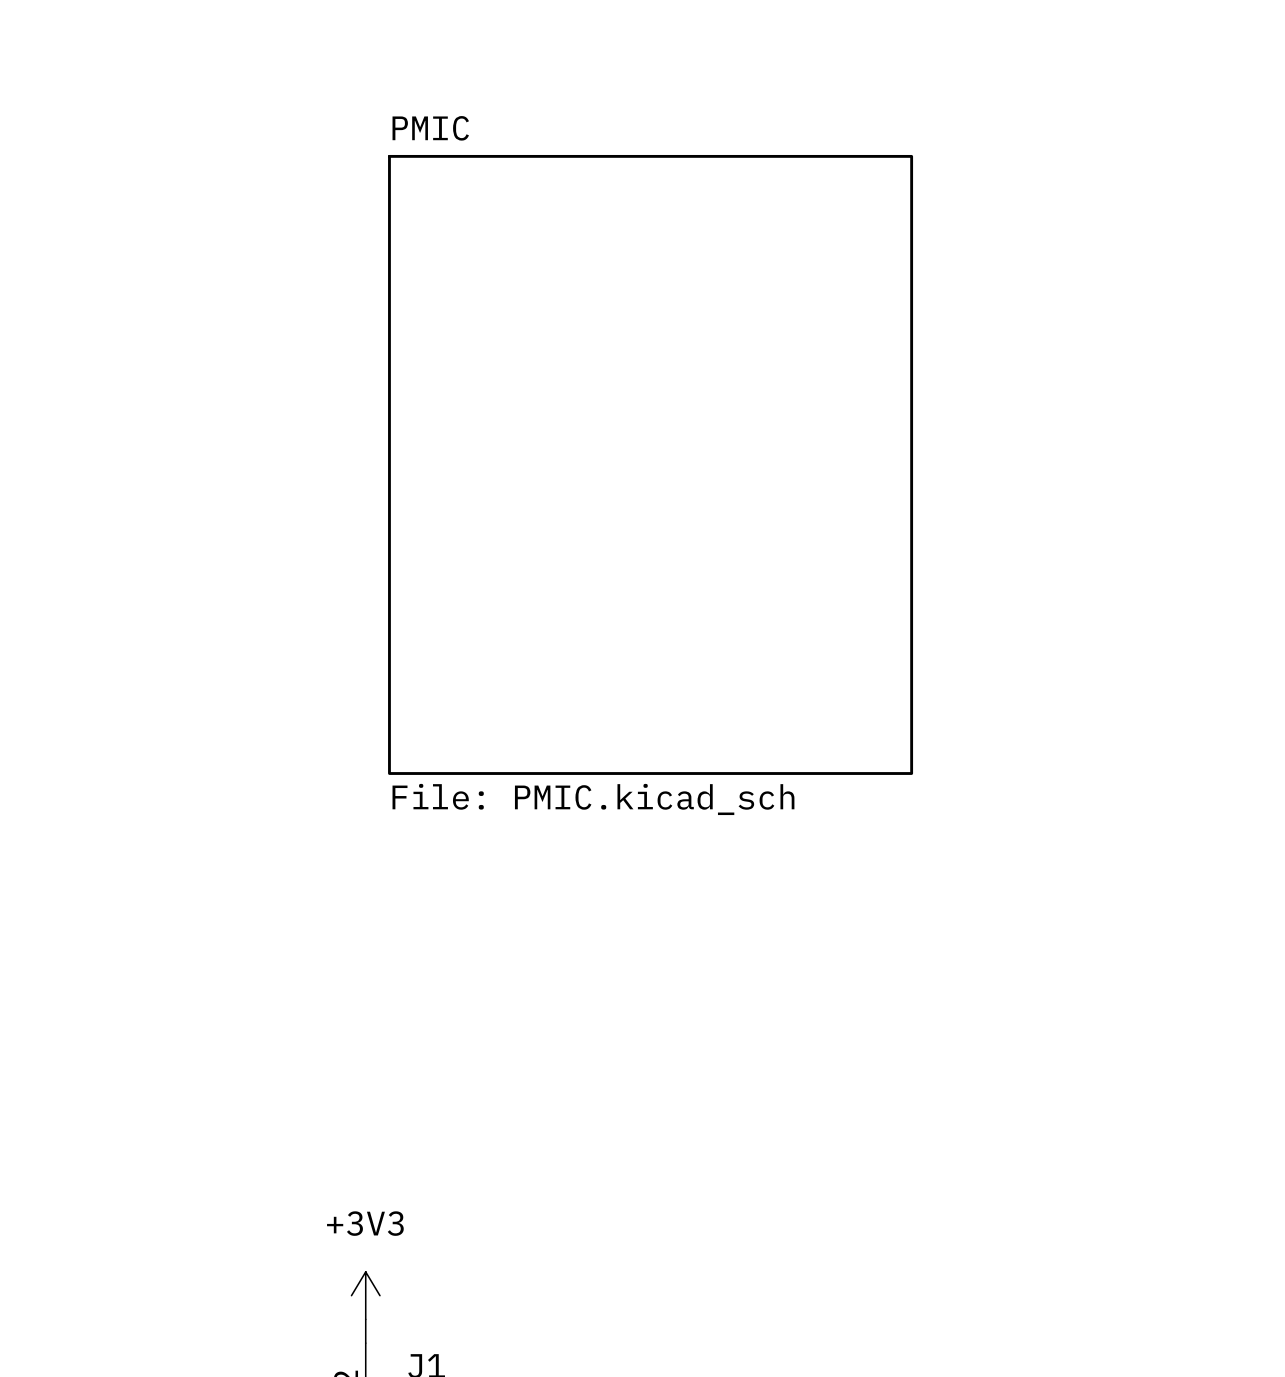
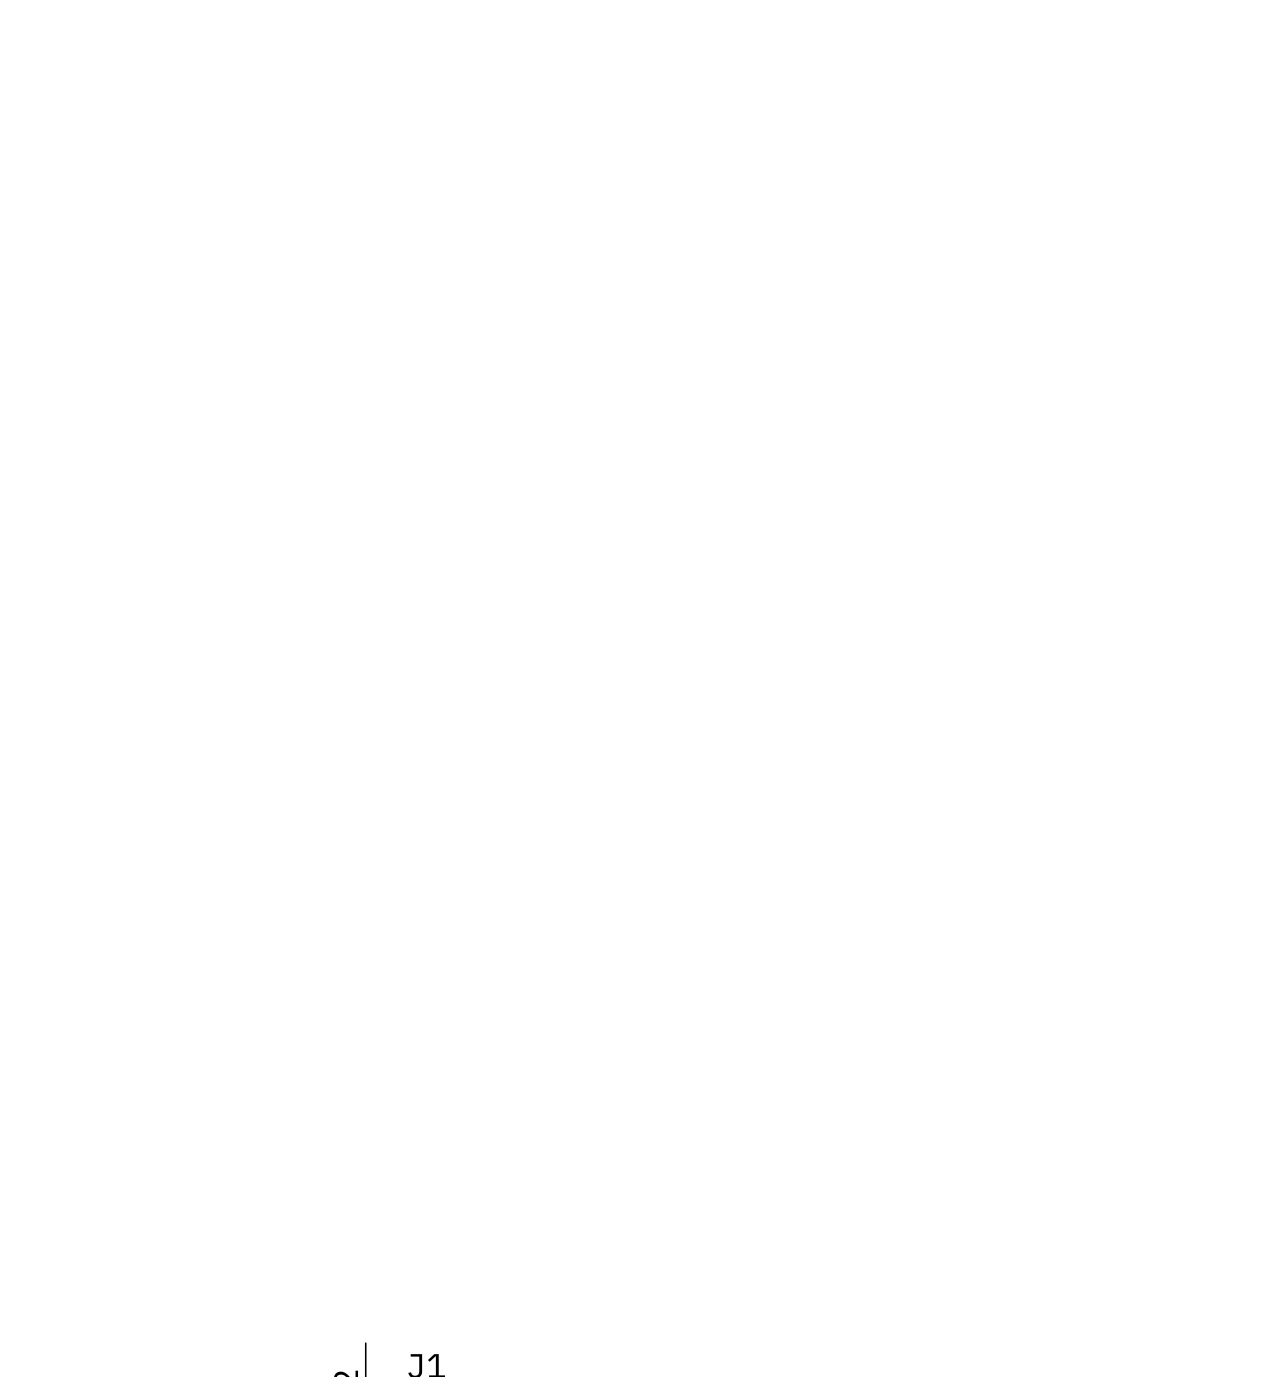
sheet PMIC: File: PMIC.kicad_sch (650, 464) -> none
power symbol: +3V3 (365, 1295) -> none
wire: (365, 1319) (365, 1343) -> none

